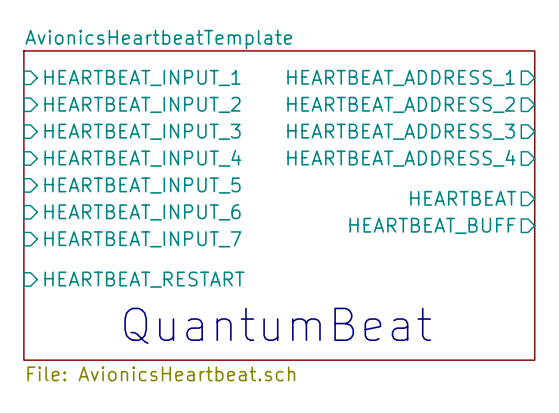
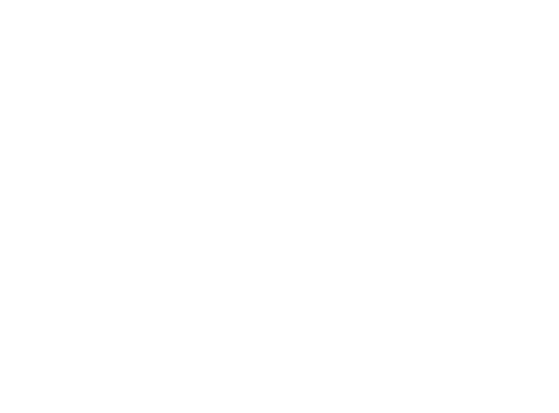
sheet pin: HEARTBEAT_INPUT_1 (142, 77) -> none
sheet pin: HEARTBEAT_ADDRESS_1 (401, 77) -> none
sheet pin: HEARTBEAT_INPUT_2 (142, 104) -> none
sheet pin: HEARTBEAT_ADDRESS_2 (401, 104) -> none
sheet pin: HEARTBEAT_INPUT_3 (142, 131) -> none
sheet pin: HEARTBEAT_ADDRESS_3 (401, 131) -> none
sheet pin: HEARTBEAT_INPUT_4 (142, 158) -> none
sheet pin: HEARTBEAT_ADDRESS_4 (401, 158) -> none
sheet pin: HEARTBEAT_INPUT_5 (142, 185) -> none
sheet pin: HEARTBEAT (463, 198) -> none
sheet AvionicsHeartbeatTemplate: File: AvionicsHeartbeat.sch (279, 205) -> none
sheet pin: HEARTBEAT_INPUT_6 (142, 212) -> none
sheet pin: HEARTBEAT_BUFF (432, 225) -> none
sheet pin: HEARTBEAT_INPUT_7 (142, 239) -> none
sheet pin: HEARTBEAT_RESTART (144, 279) -> none
text: QuantumBeat (277, 325) -> none

